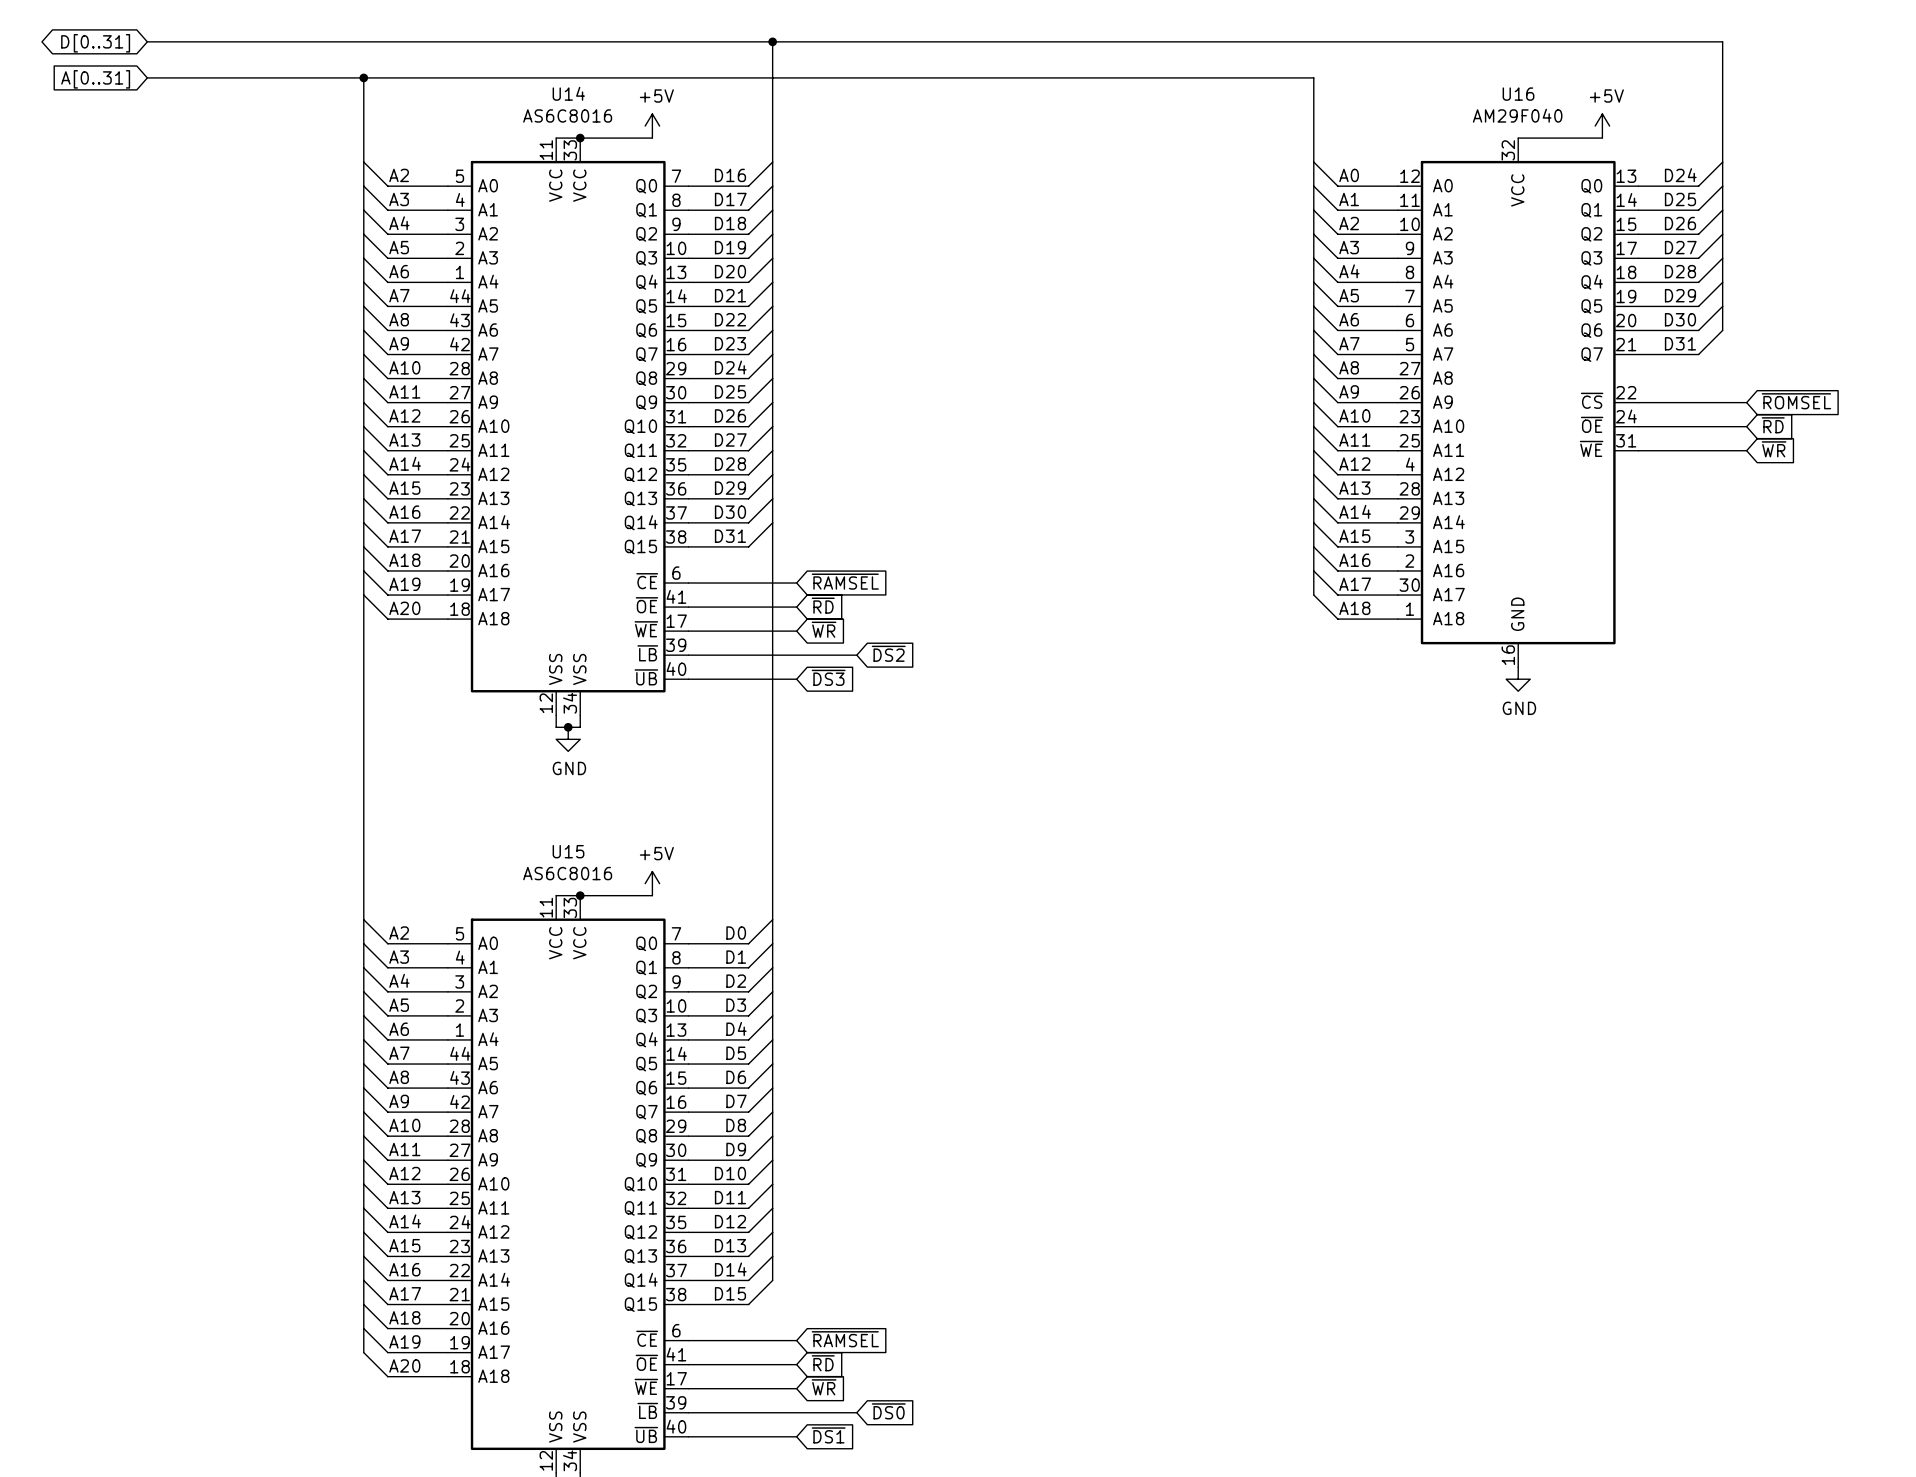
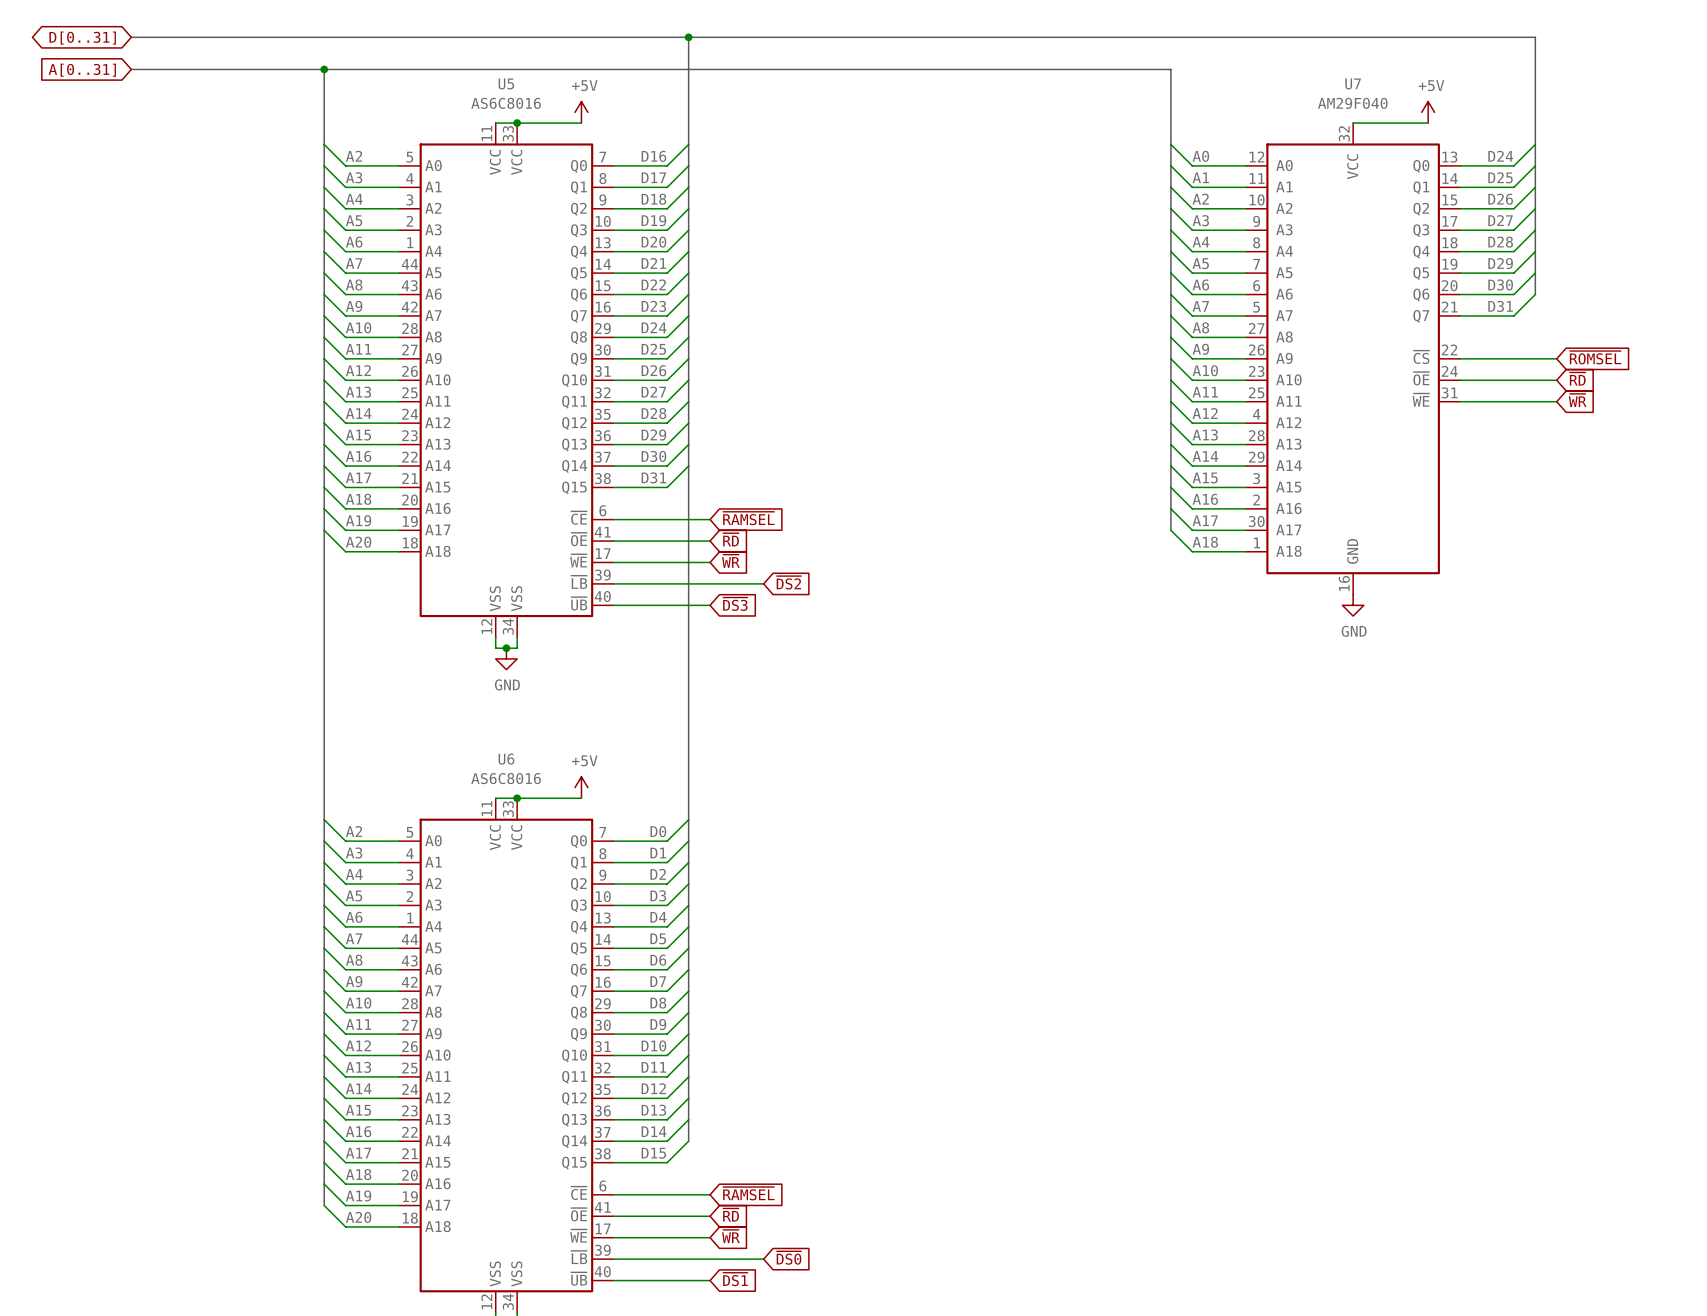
U14 name: U14 (568, 93) -> U5 (506, 83)
U16 name: U16 (1518, 94) -> U7 (1353, 83)
U15 name: U15 (568, 851) -> U6 (506, 759)

